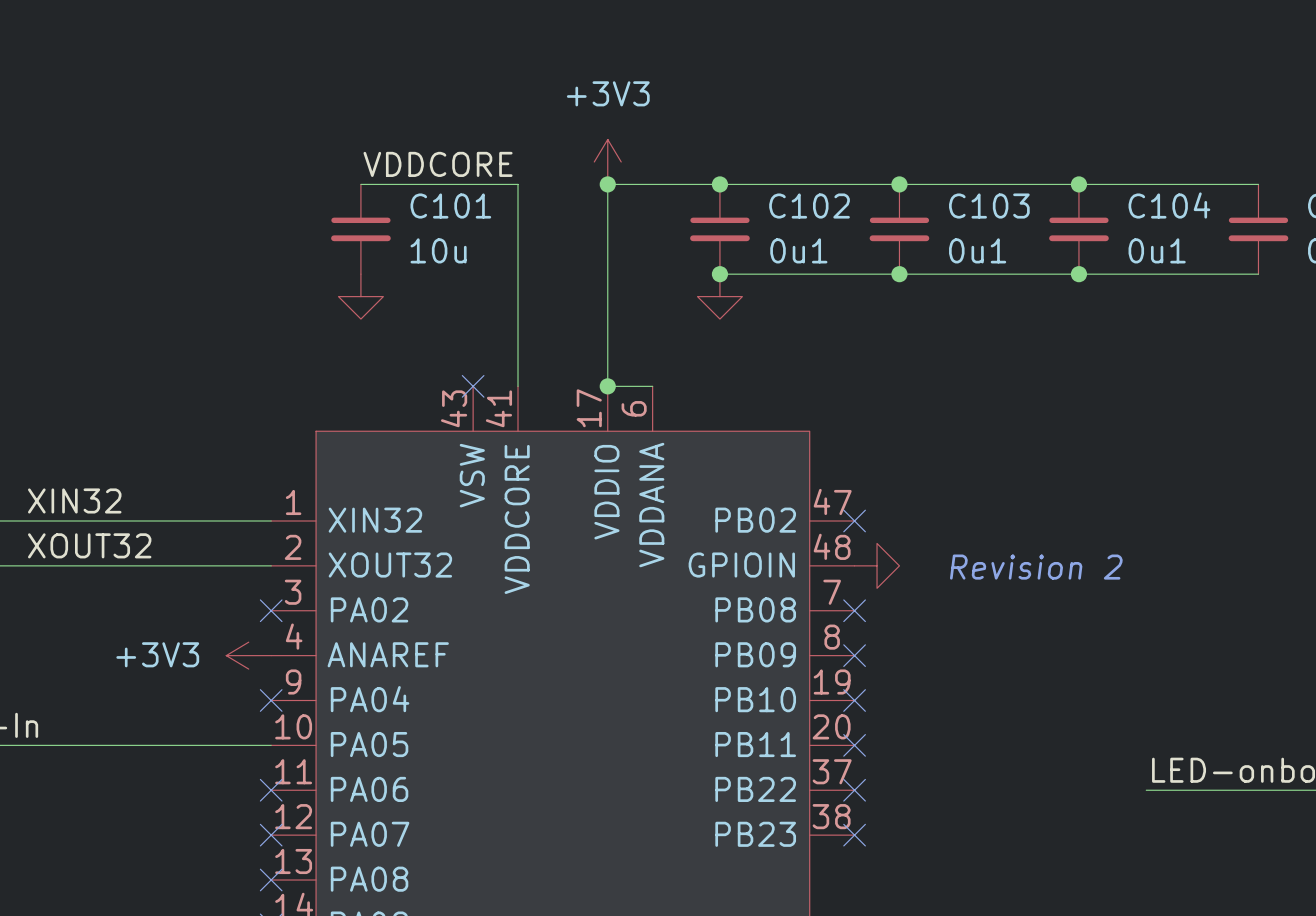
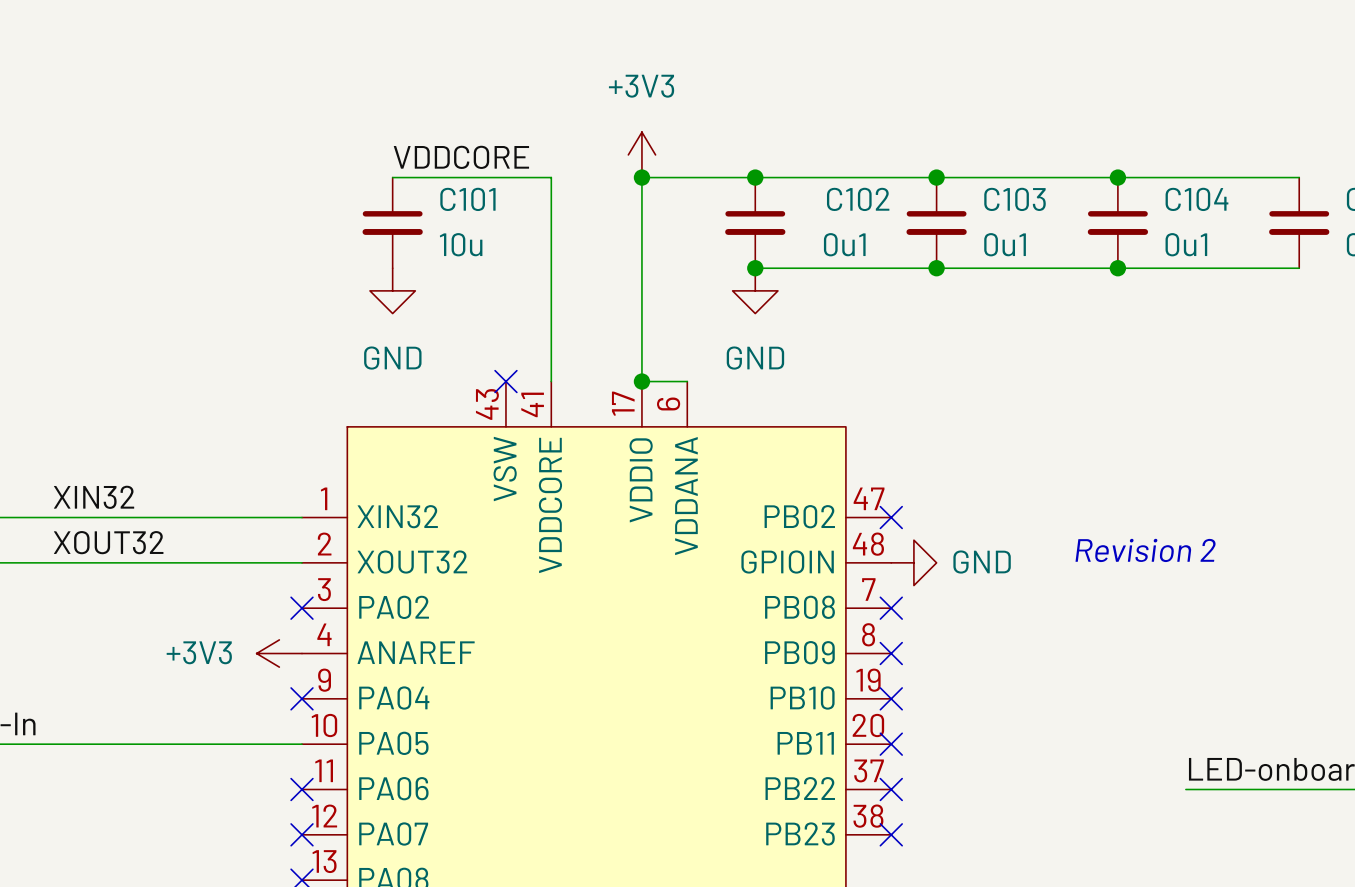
power symbol text: none -> GND (392, 358)
power symbol text: none -> GND (755, 358)
power symbol text: none -> GND (982, 562)
text position: Revision 2 (1036, 567) -> Revision 2 (1145, 550)

